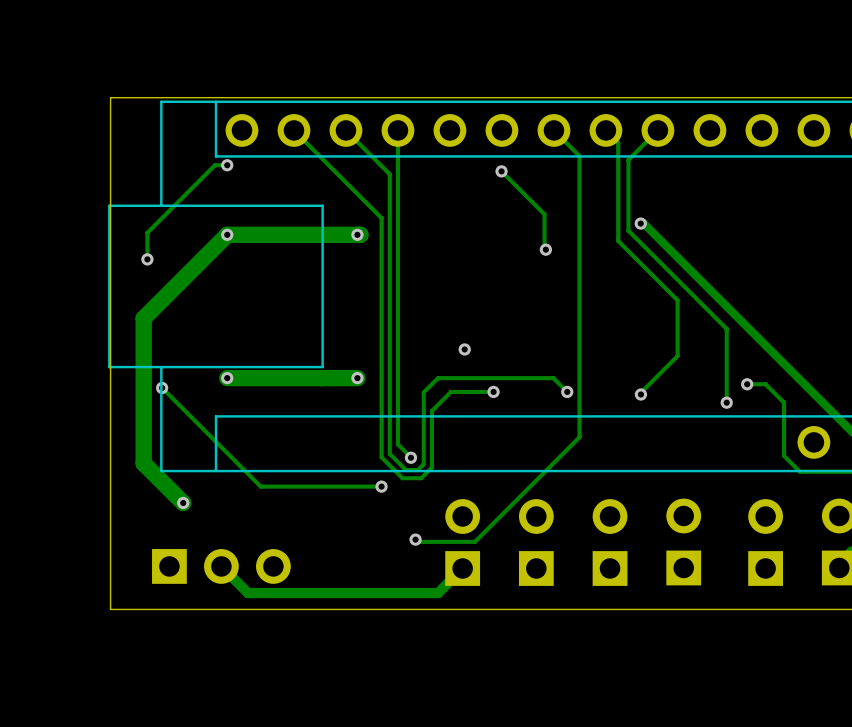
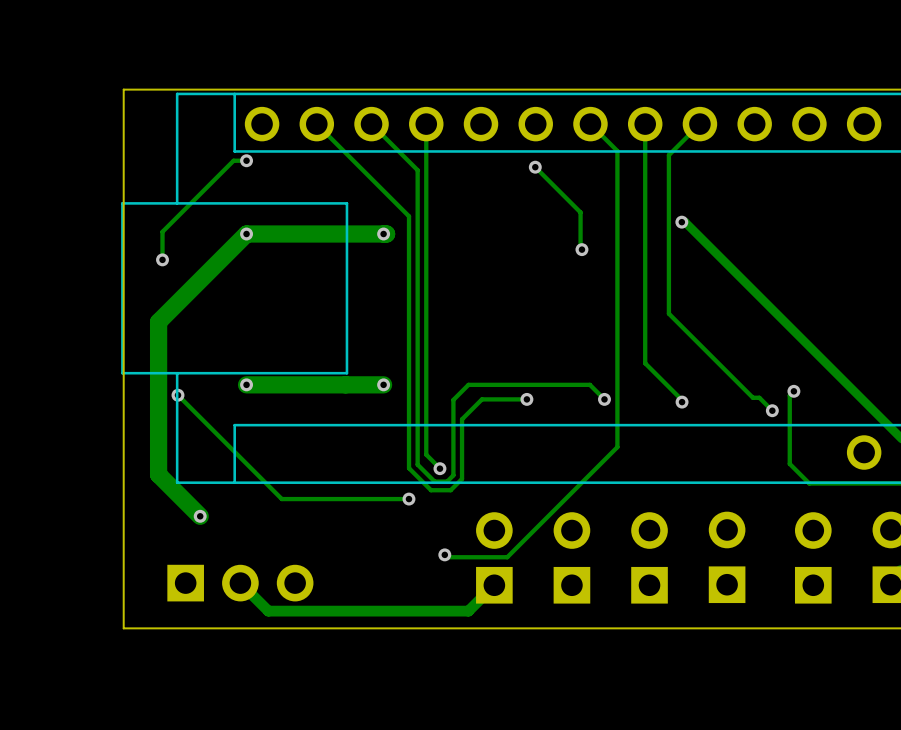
track: (605, 130) (618, 142) (618, 240) (677, 300) (677, 356) (640, 392) -> (645, 124) (645, 363) (682, 400)
track: (628, 230) (726, 329) (726, 402) -> (668, 229) (668, 313) (752, 397) (759, 397) (772, 410)
via: (464, 349) -> none
track: (747, 384) (765, 384) (784, 402) (784, 455) (799, 471) -> (793, 391) (789, 395) (789, 463) (809, 483) (849, 483)

